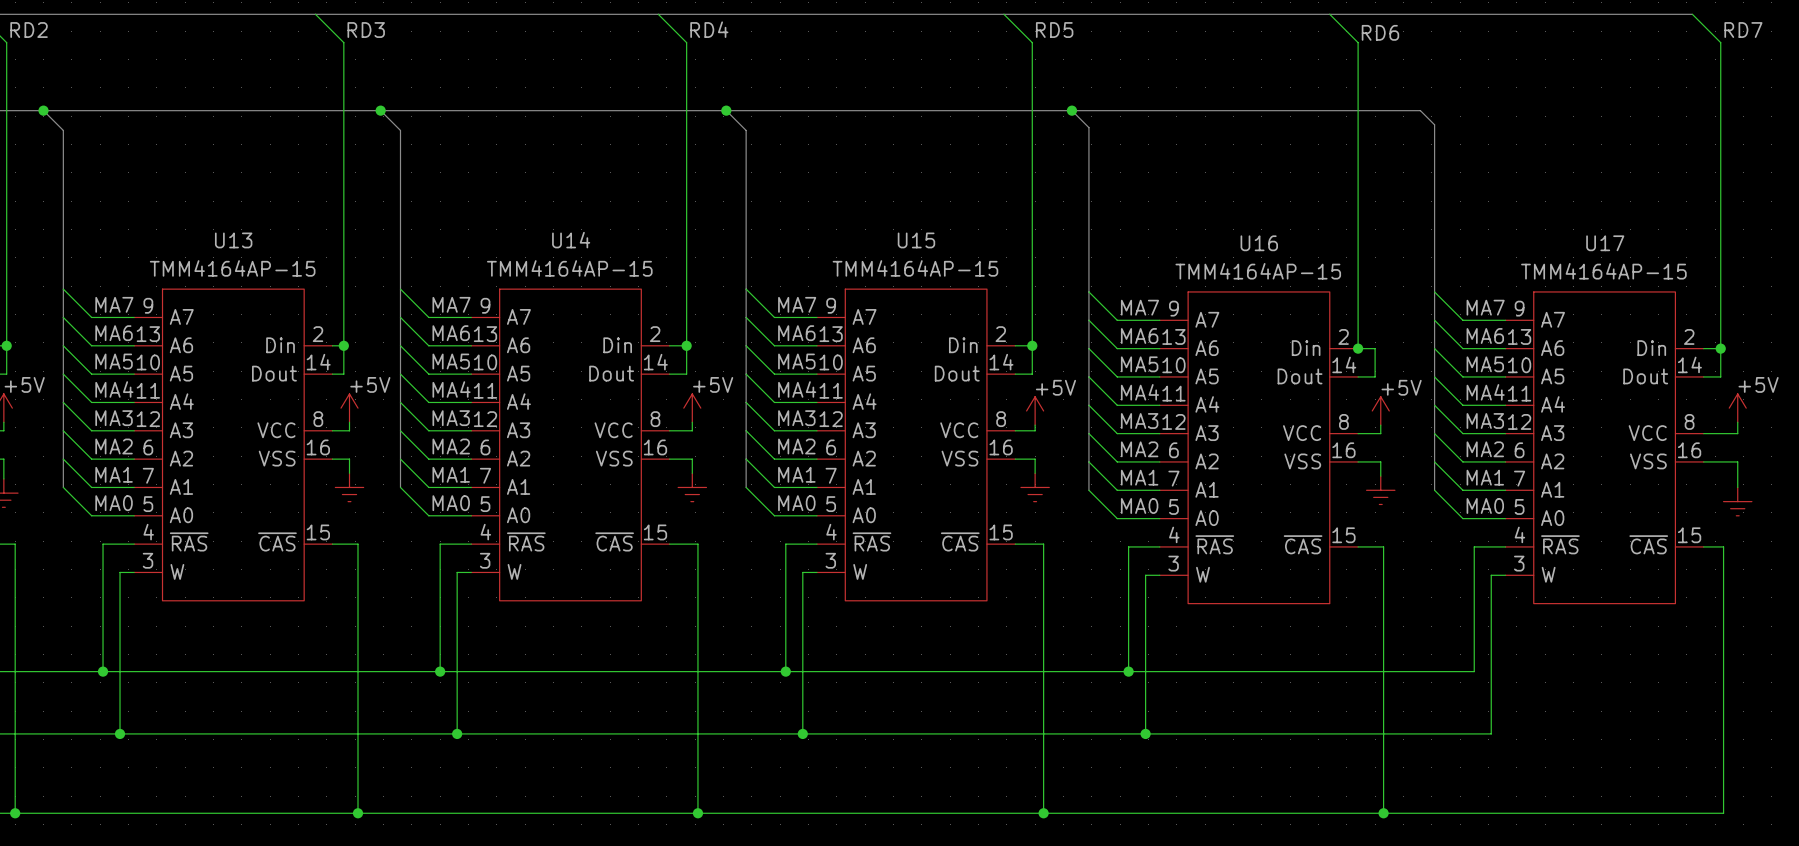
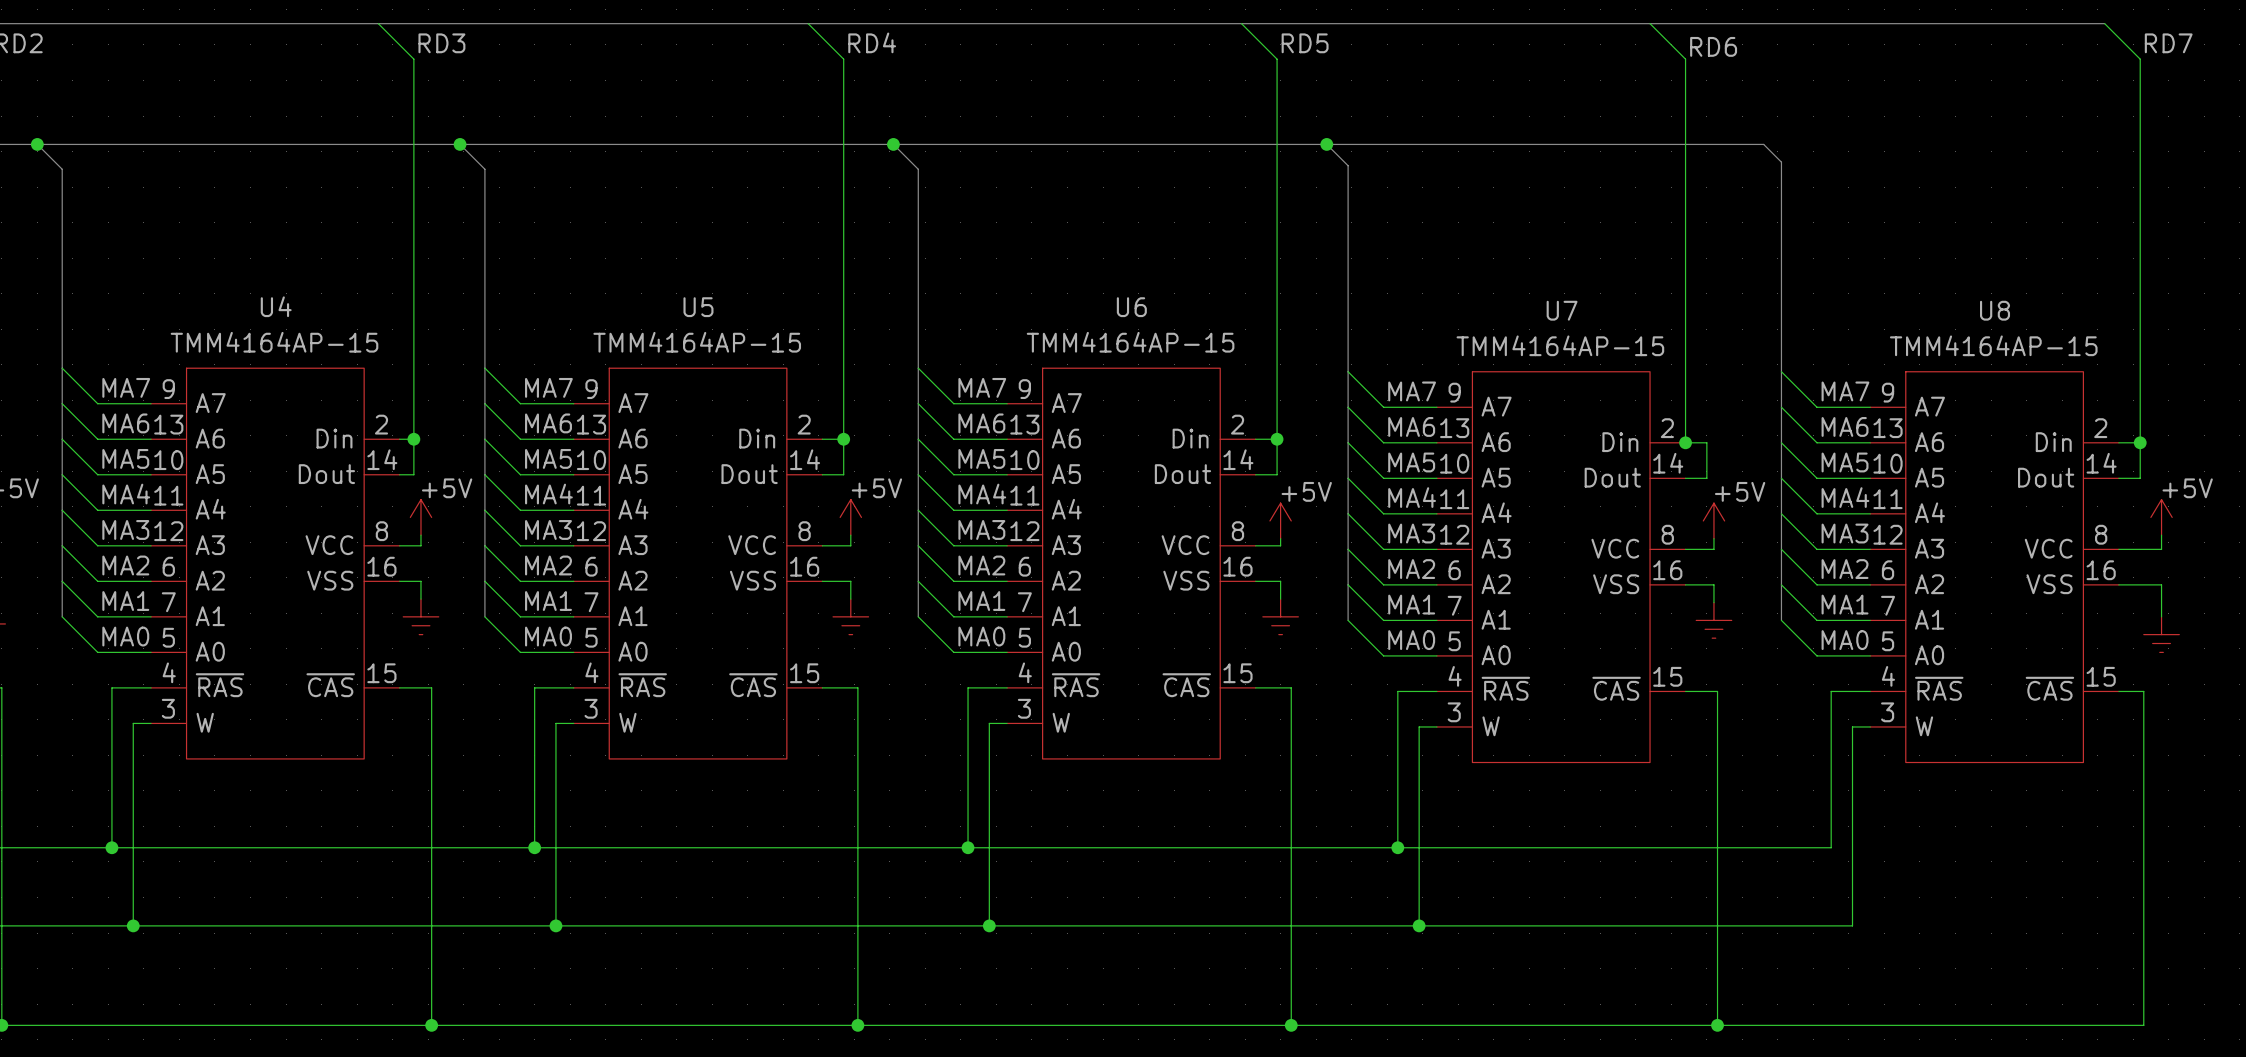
U13 name: U13 (233, 240) -> U4 (276, 306)
U14 name: U14 (571, 240) -> U5 (698, 307)
U15 name: U15 (916, 240) -> U6 (1131, 307)
U16 name: U16 (1259, 243) -> U7 (1562, 310)
U17 name: U17 (1605, 243) -> U8 (1995, 310)

